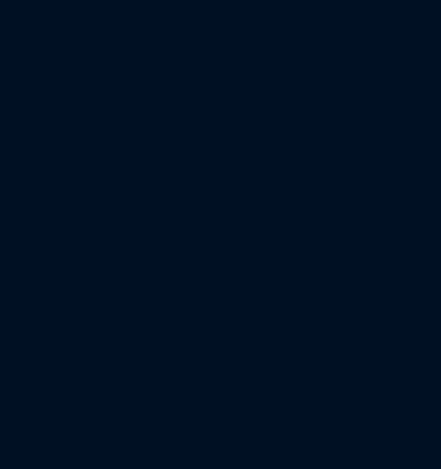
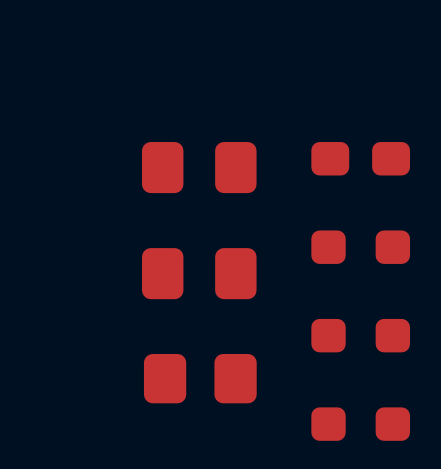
part: none -> (360, 158)
part: none -> (199, 167)
part: none -> (360, 247)
part: none -> (199, 273)
part: none -> (360, 335)
part: none -> (200, 378)
part: none -> (360, 424)

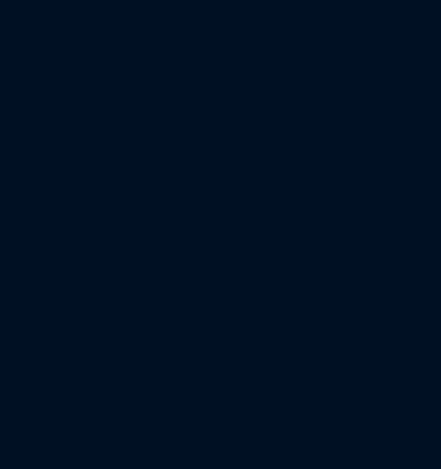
part: (360, 158) -> none
part: (199, 167) -> none
part: (360, 247) -> none
part: (199, 273) -> none
part: (360, 335) -> none
part: (200, 378) -> none
part: (360, 424) -> none

